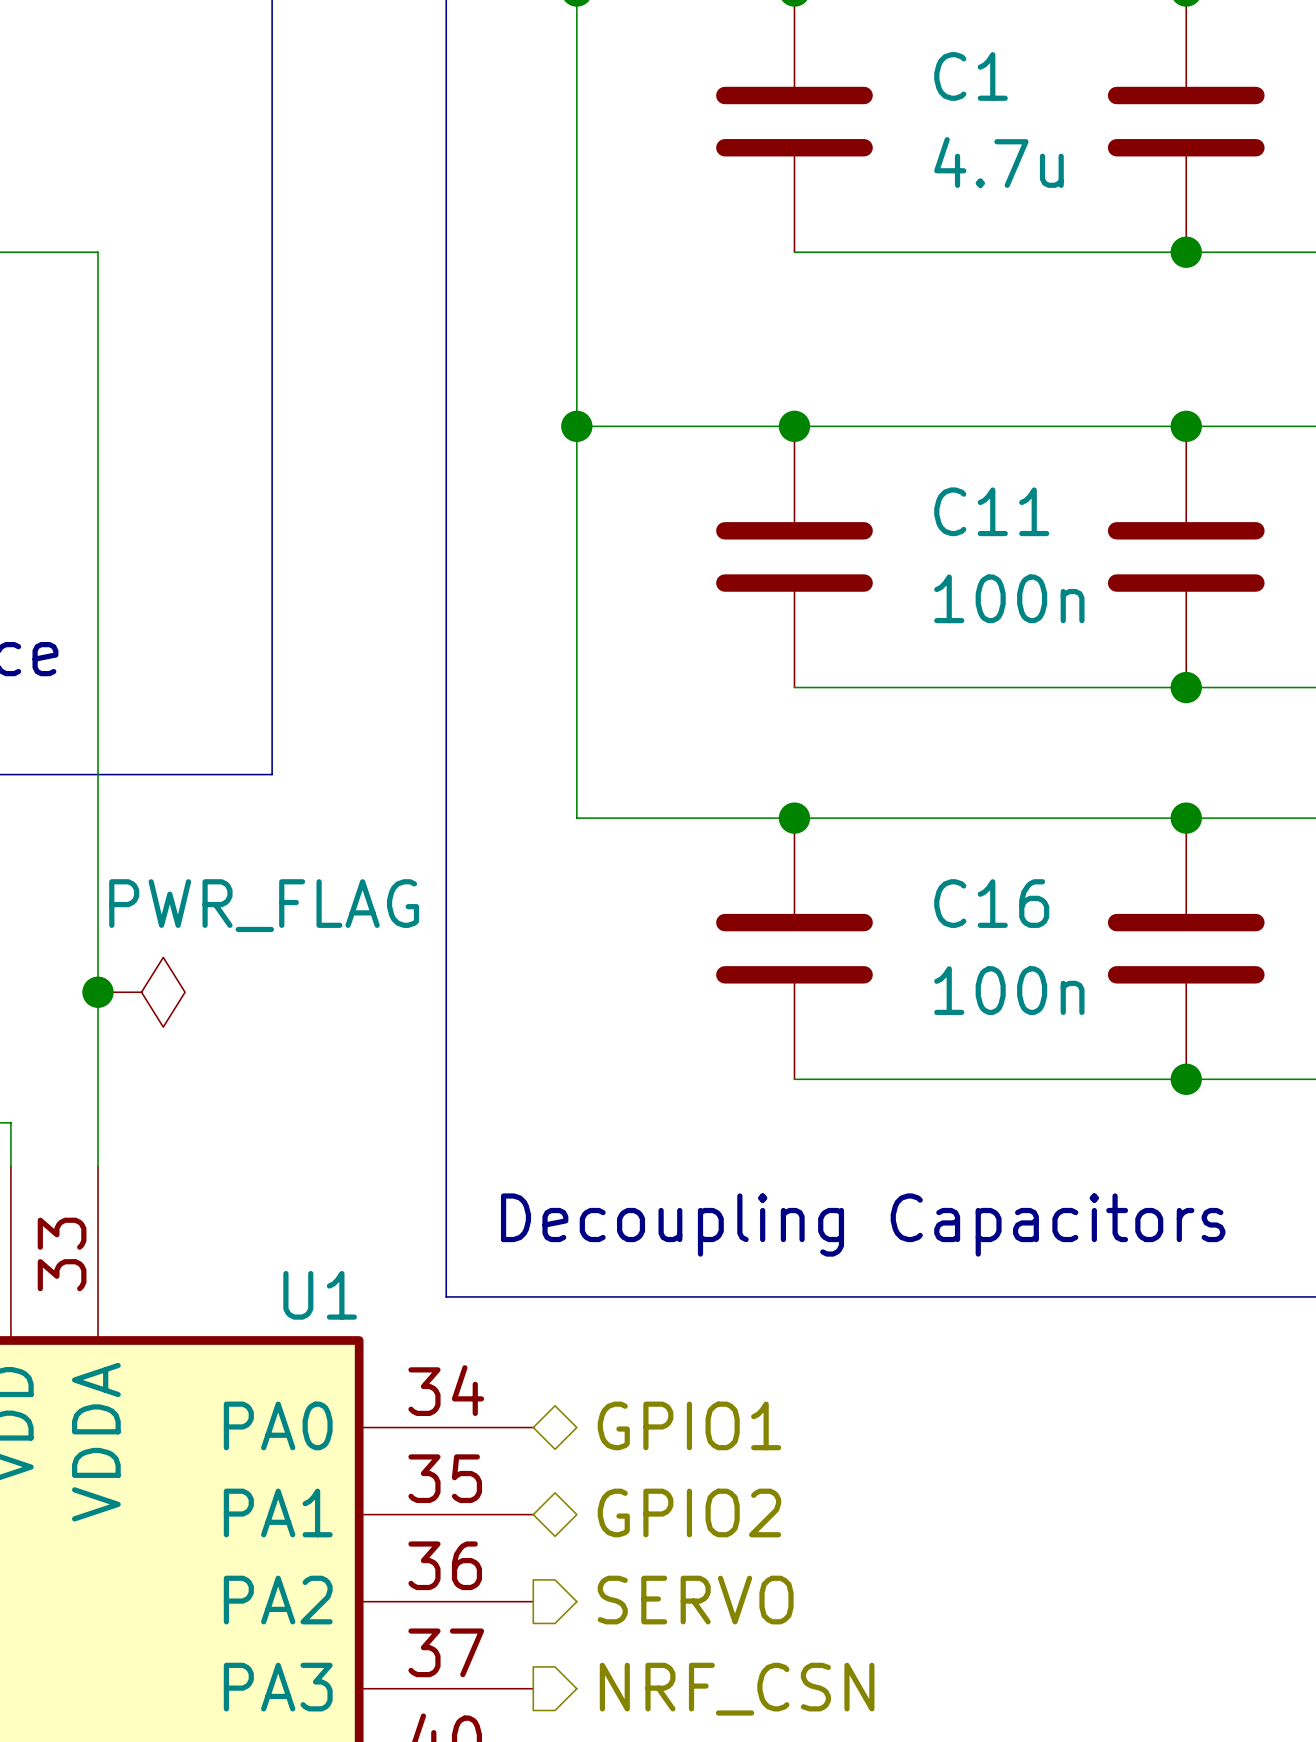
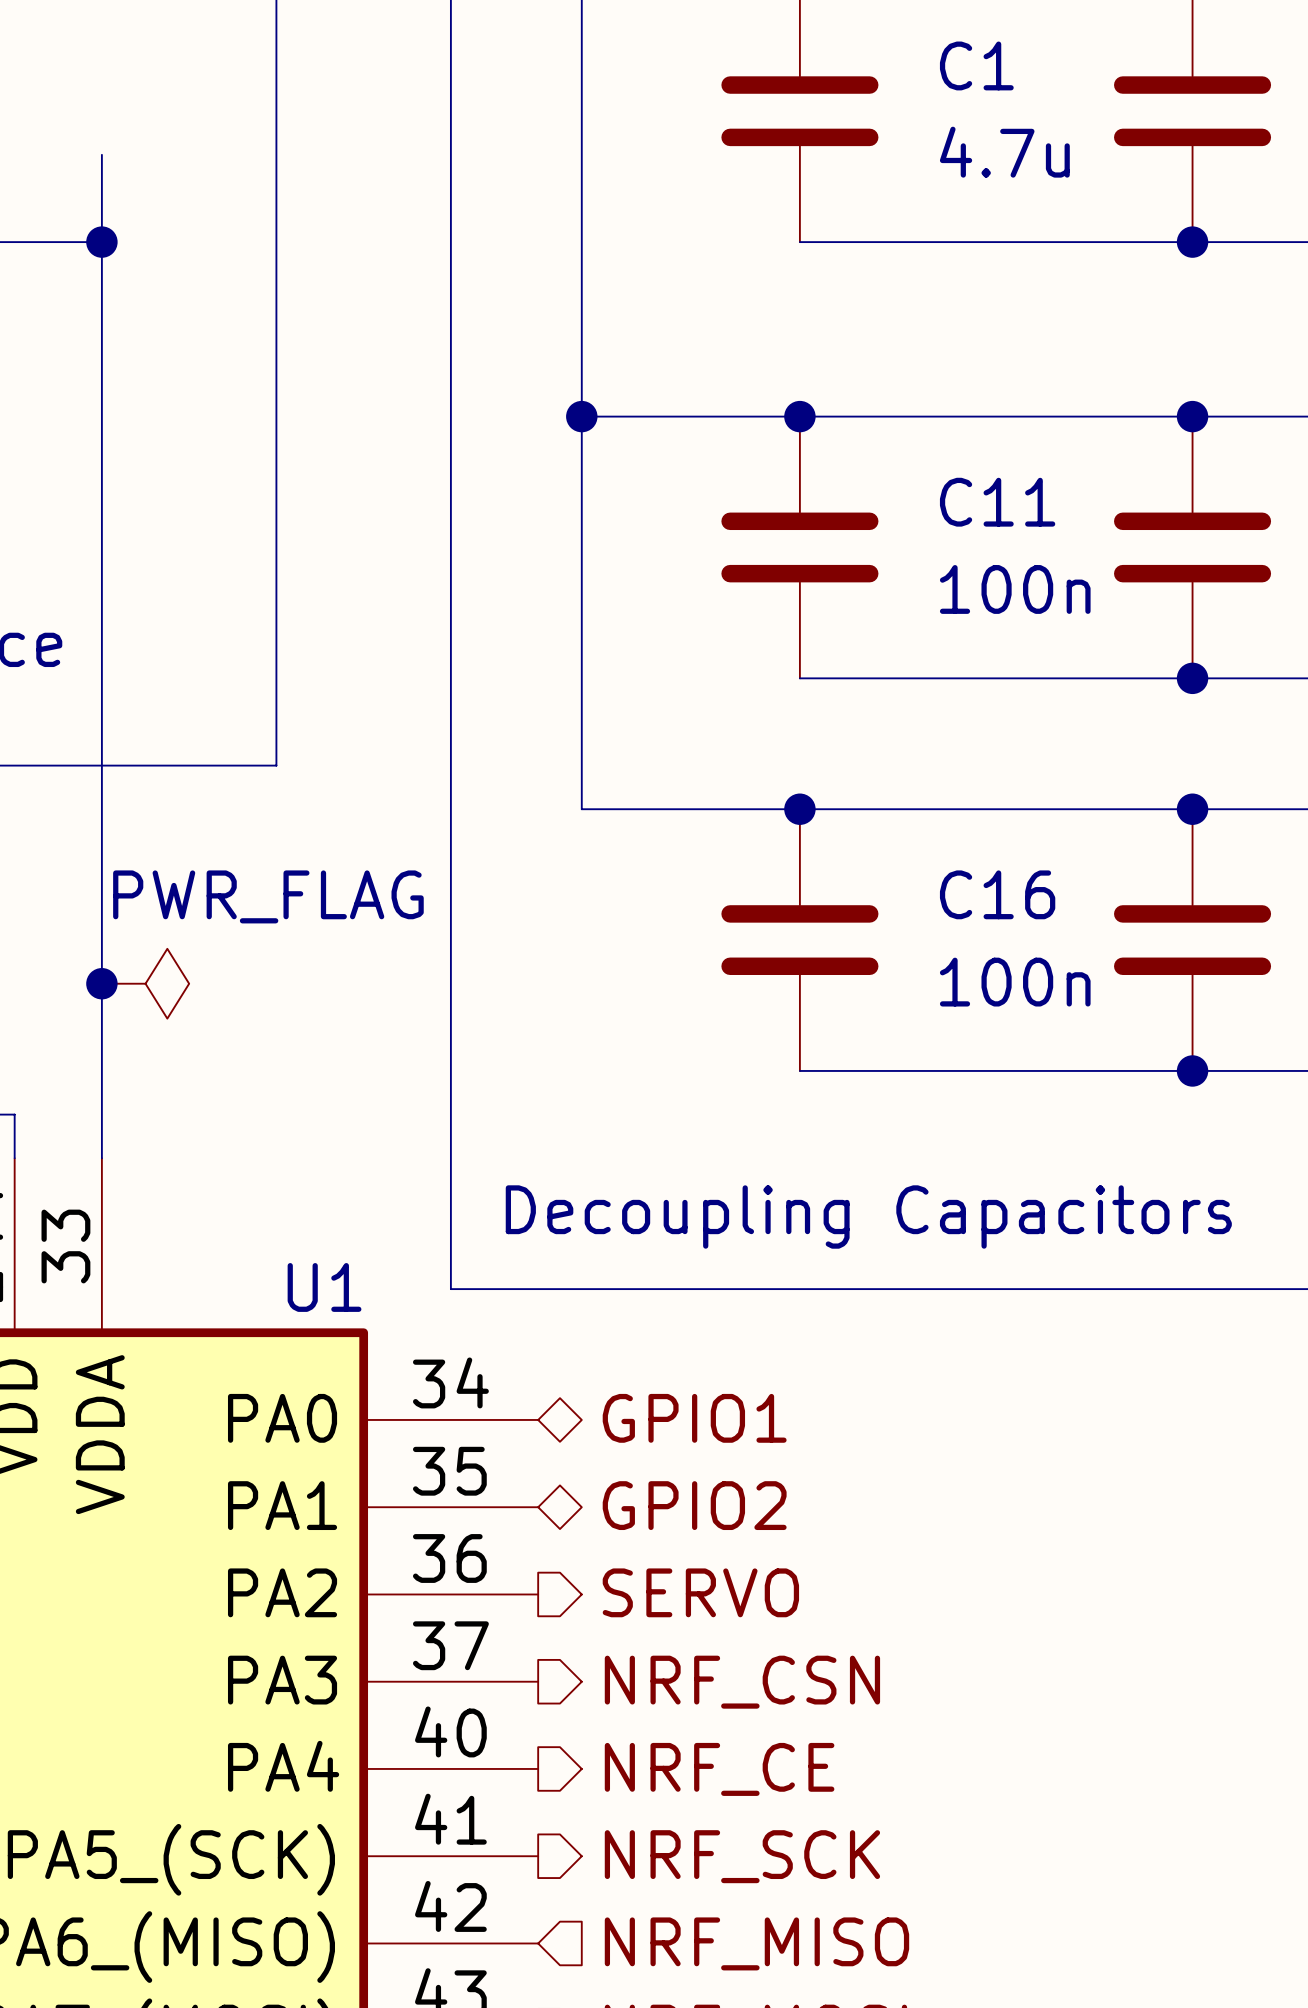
wire: none -> (101, 154) (101, 242)
junction: none -> (101, 242)

